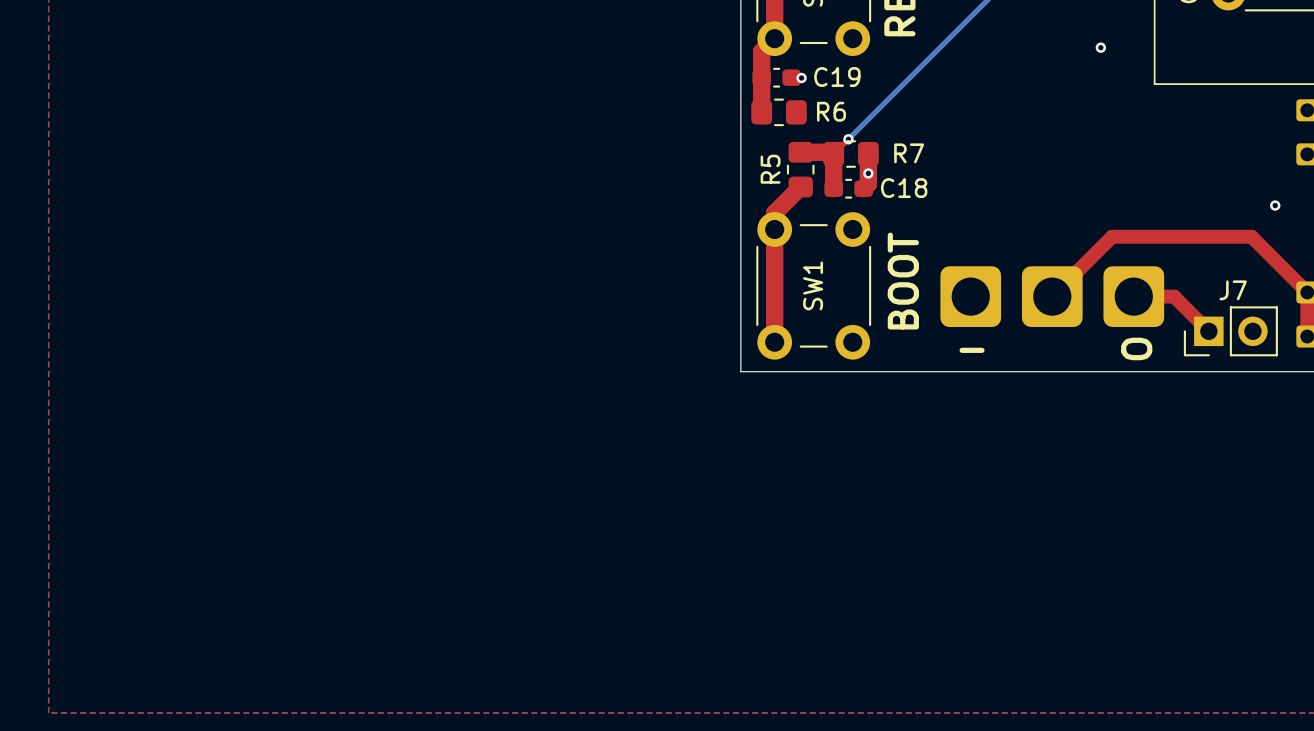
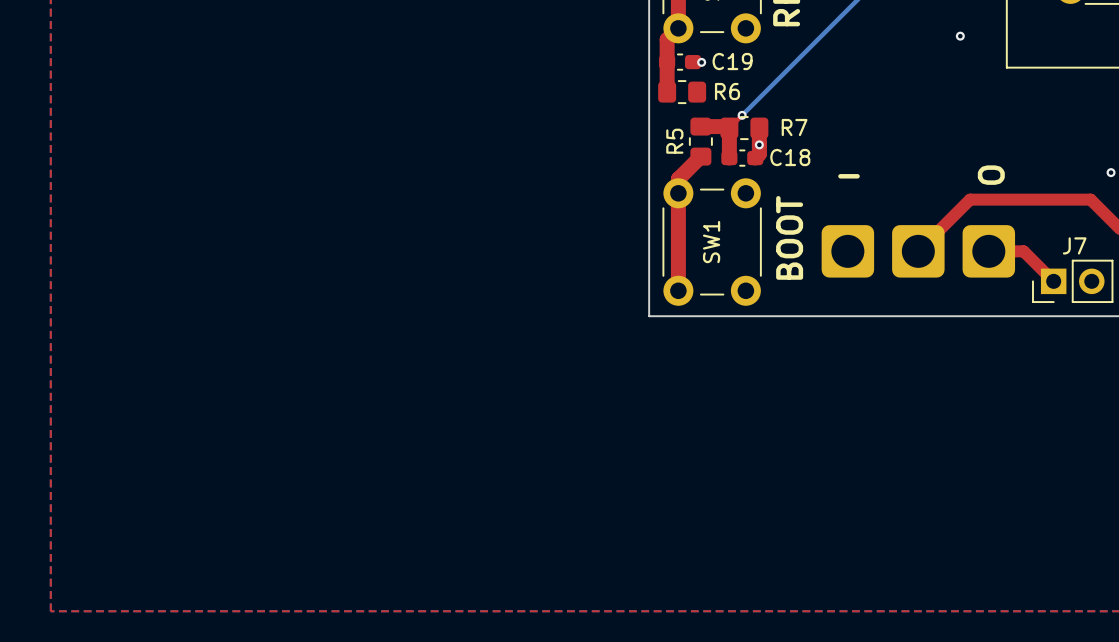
text position: O (1136, 348) -> O (991, 175)
text position: - (972, 350) -> - (849, 176)

